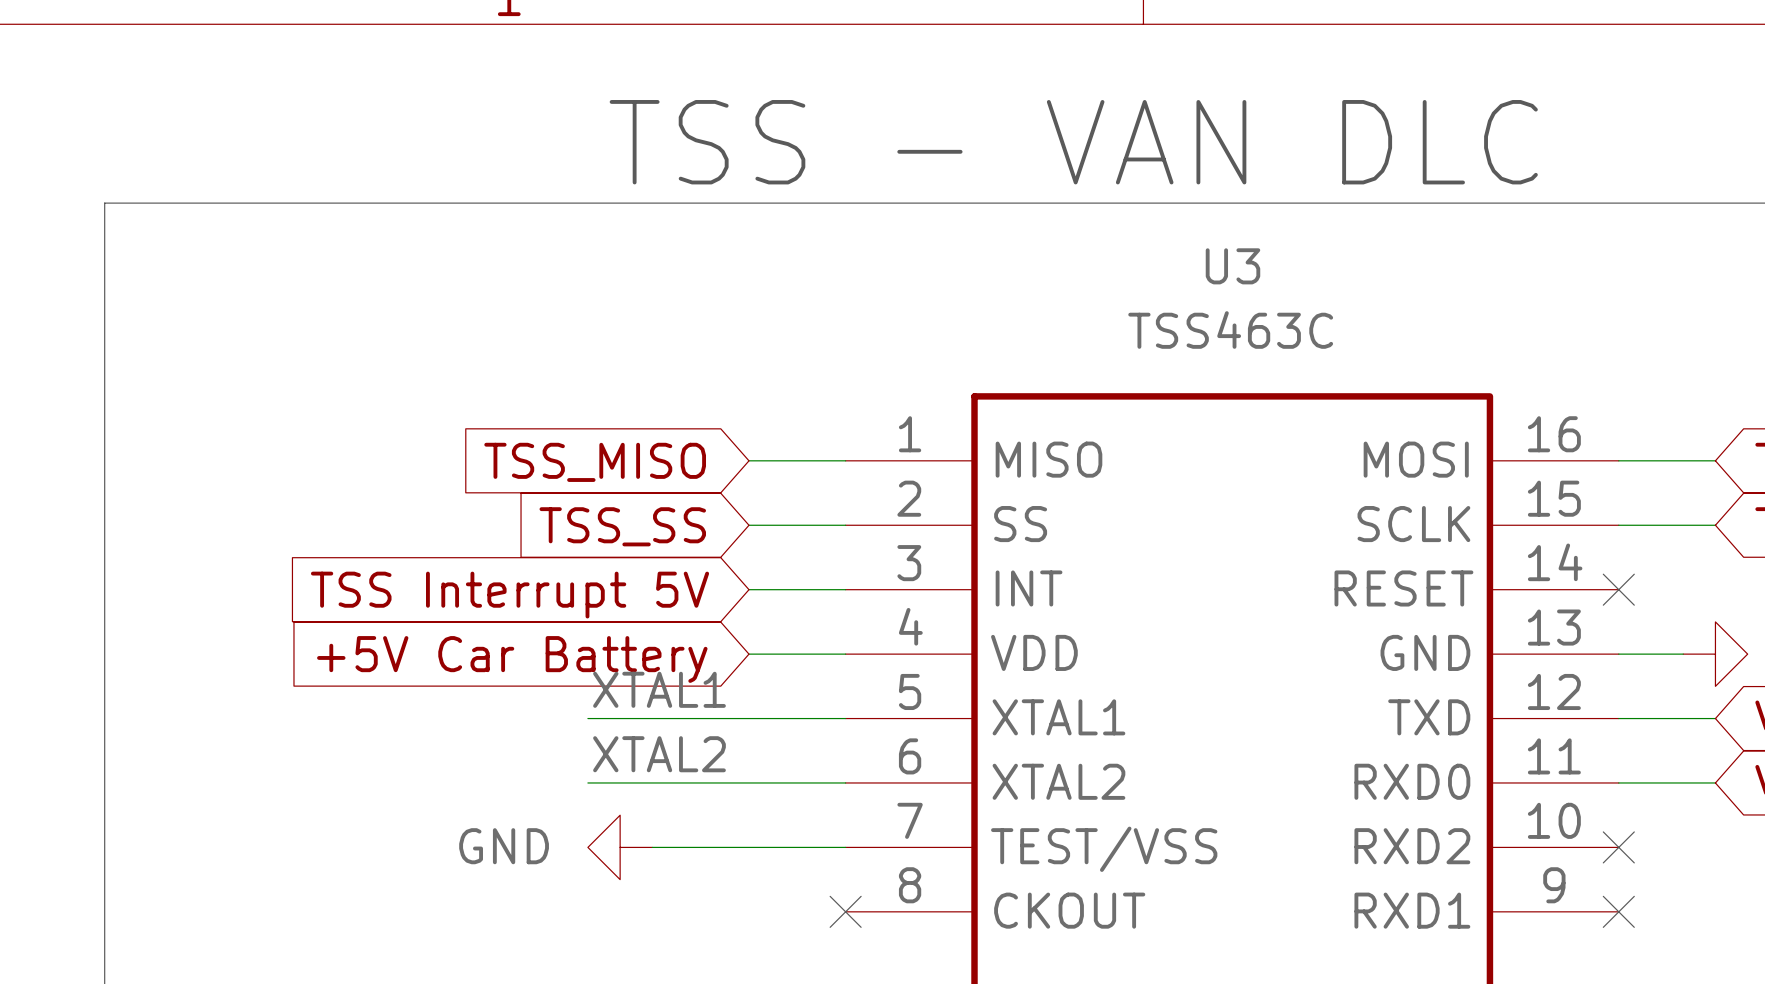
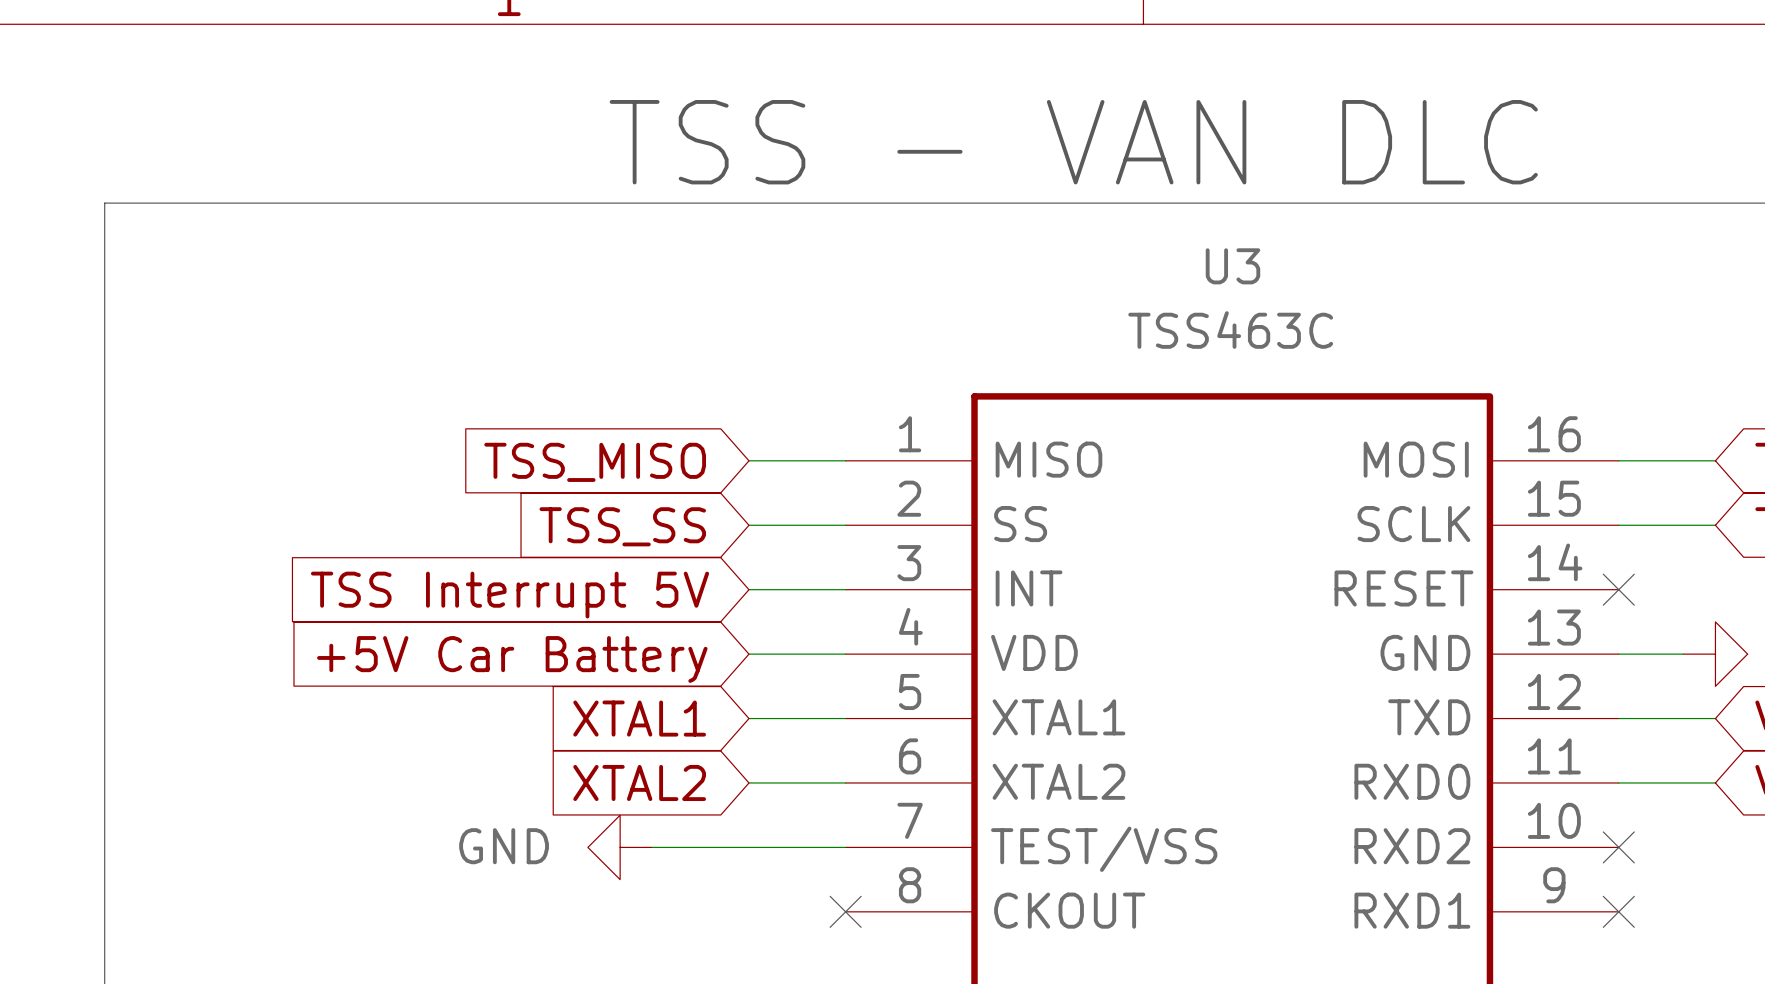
label: XTAL1 (659, 689) -> none
wire: (587, 718) (748, 718) -> none
global label: none -> XTAL1 (639, 718)
label: XTAL2 (659, 754) -> none
wire: (587, 782) (748, 782) -> none
global label: none -> XTAL2 (639, 782)

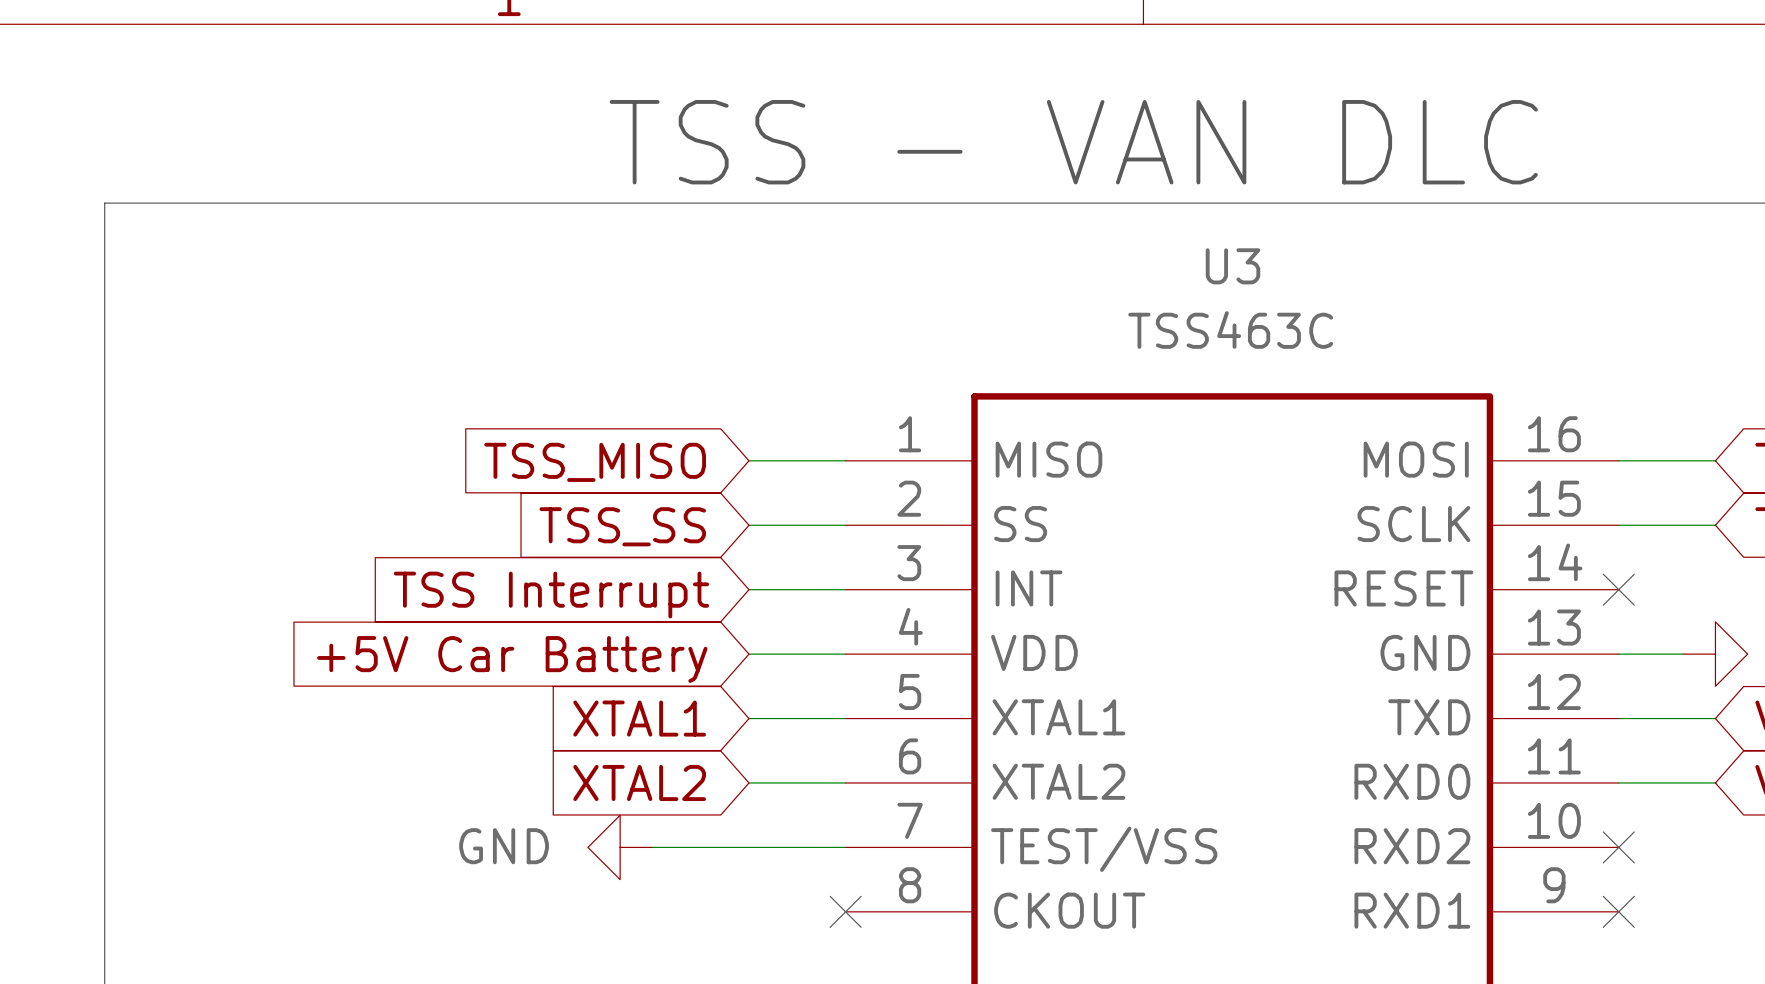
global label: TSS Interrupt 5V (510, 595) -> TSS Interrupt (551, 595)

